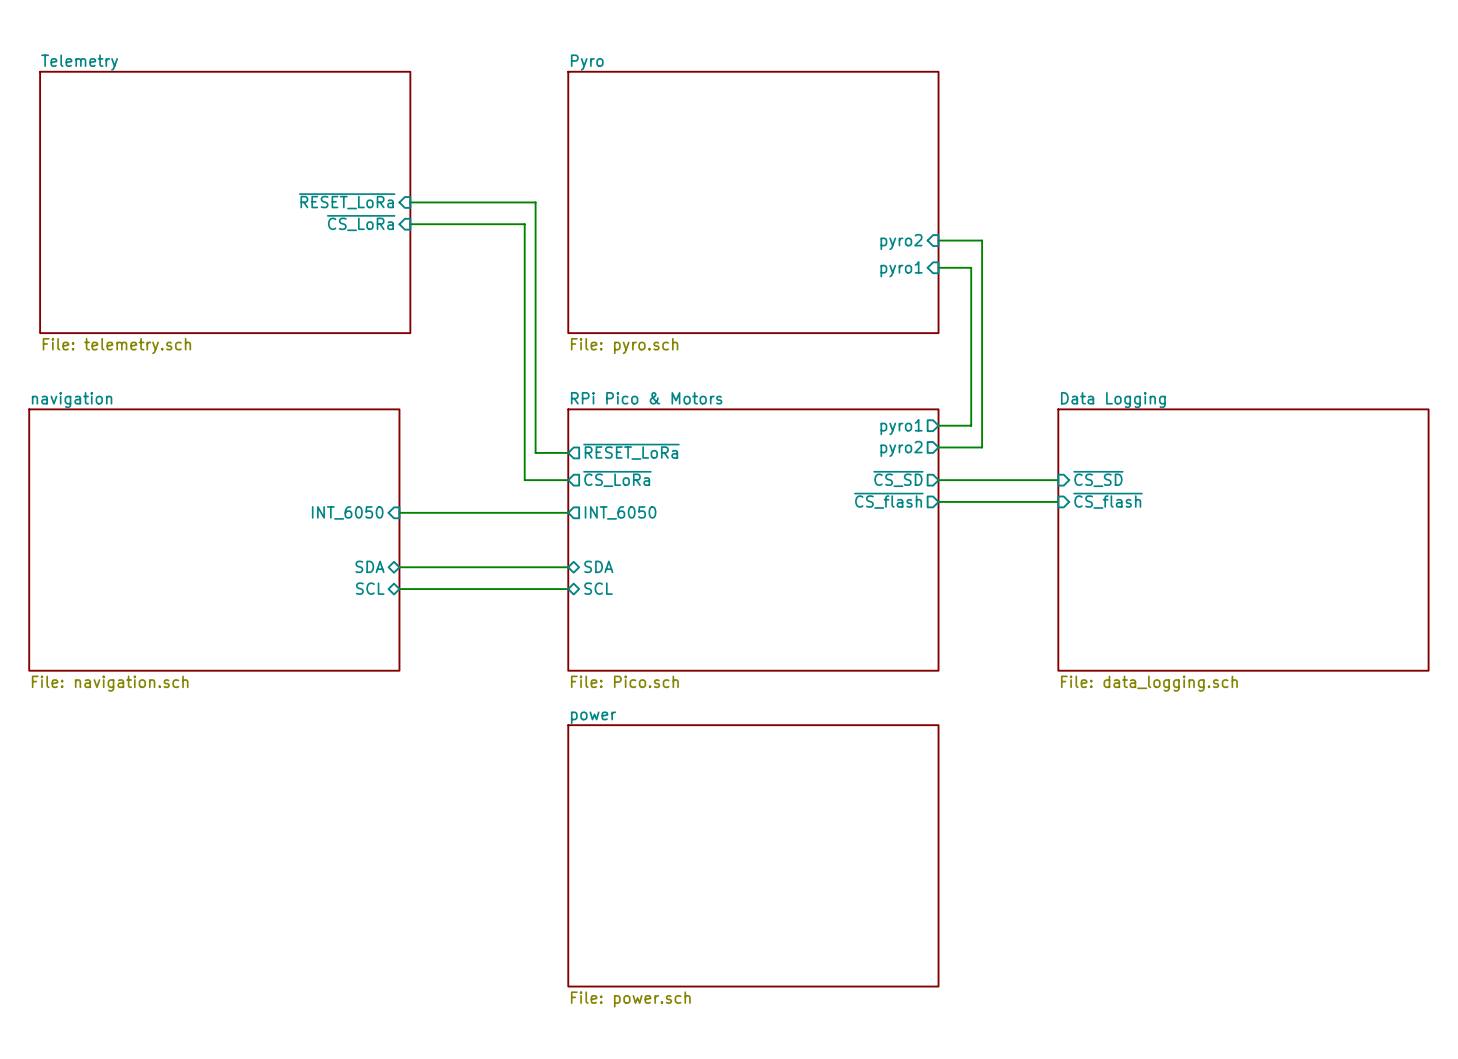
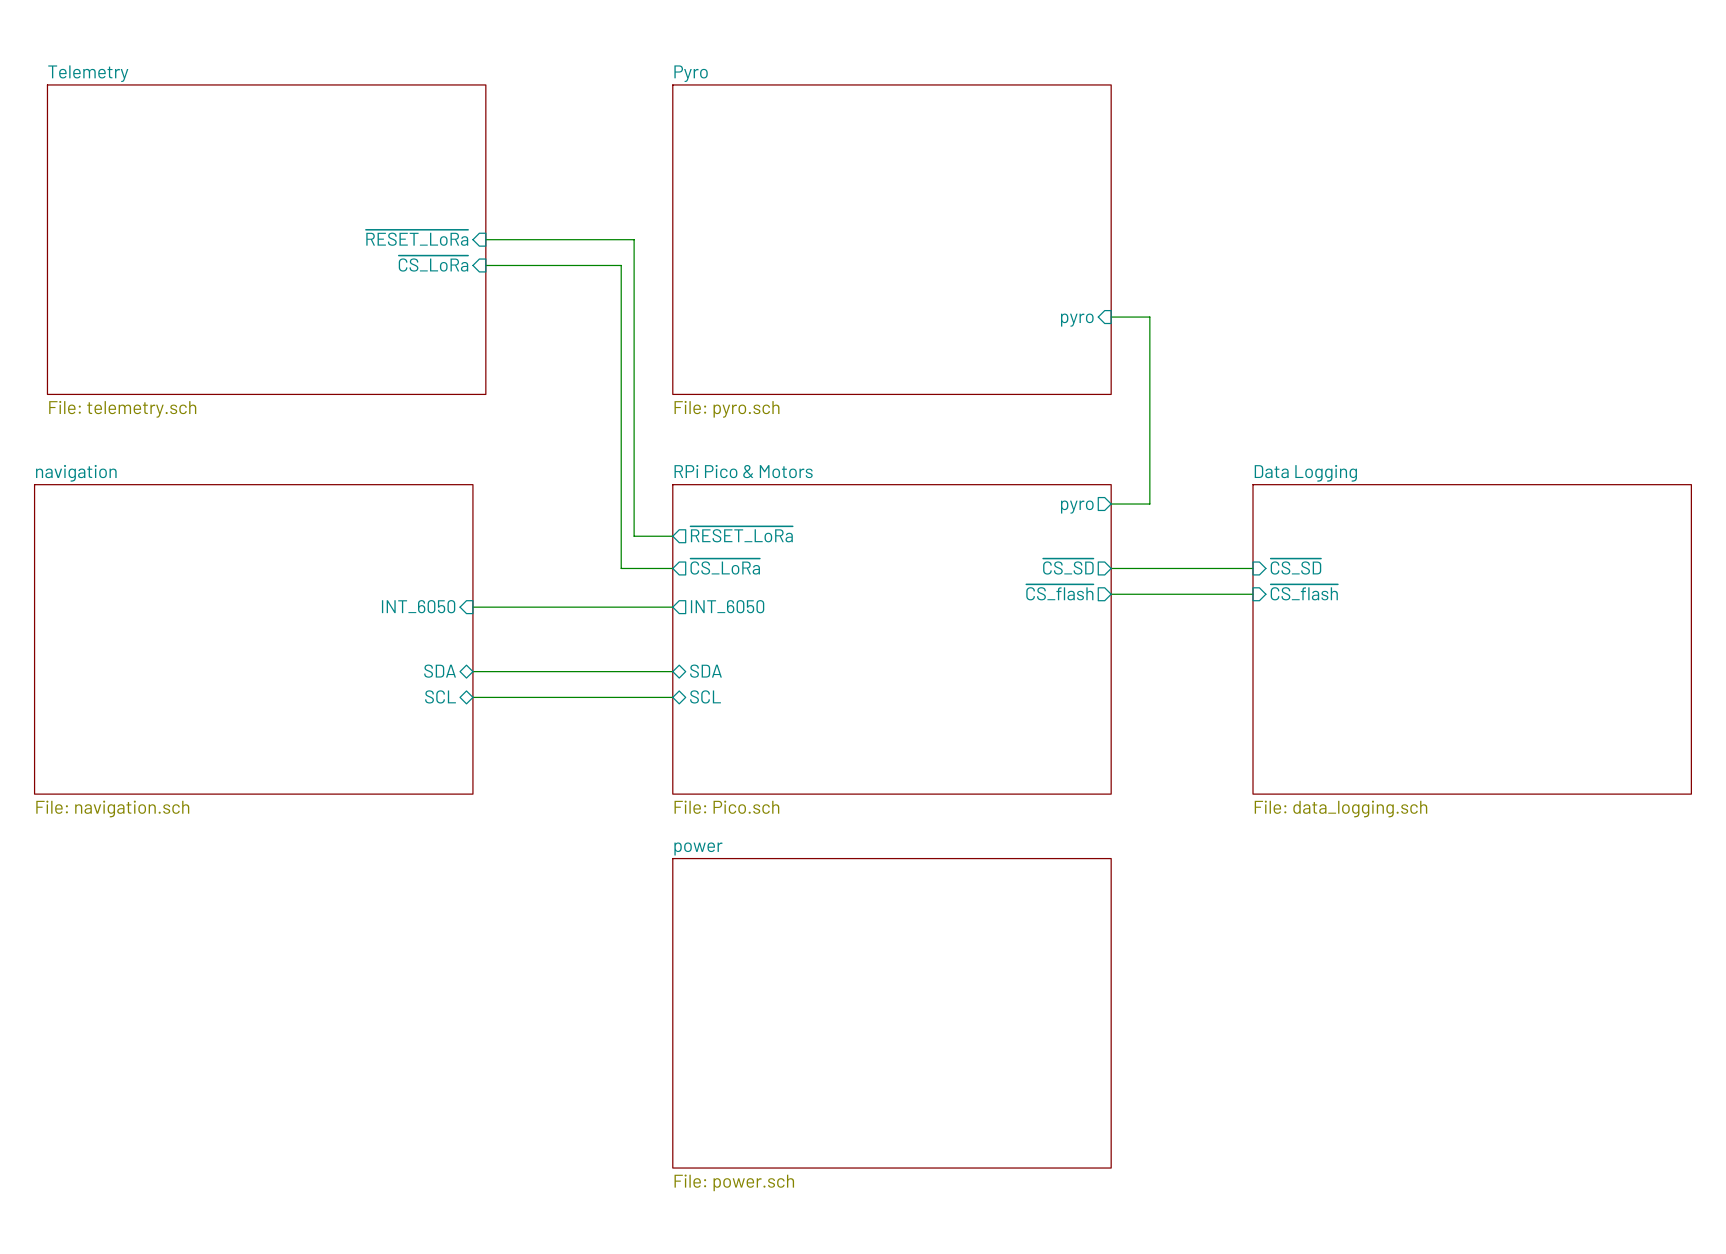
wire: (938, 240) (982, 240) (982, 447) (938, 447) -> none
sheet pin: pyro2 (901, 241) -> none
sheet pin: pyro1 (901, 269) -> pyro (1077, 320)
sheet pin: pyro1 (901, 427) -> pyro (1077, 507)
sheet pin: pyro2 (901, 448) -> none

